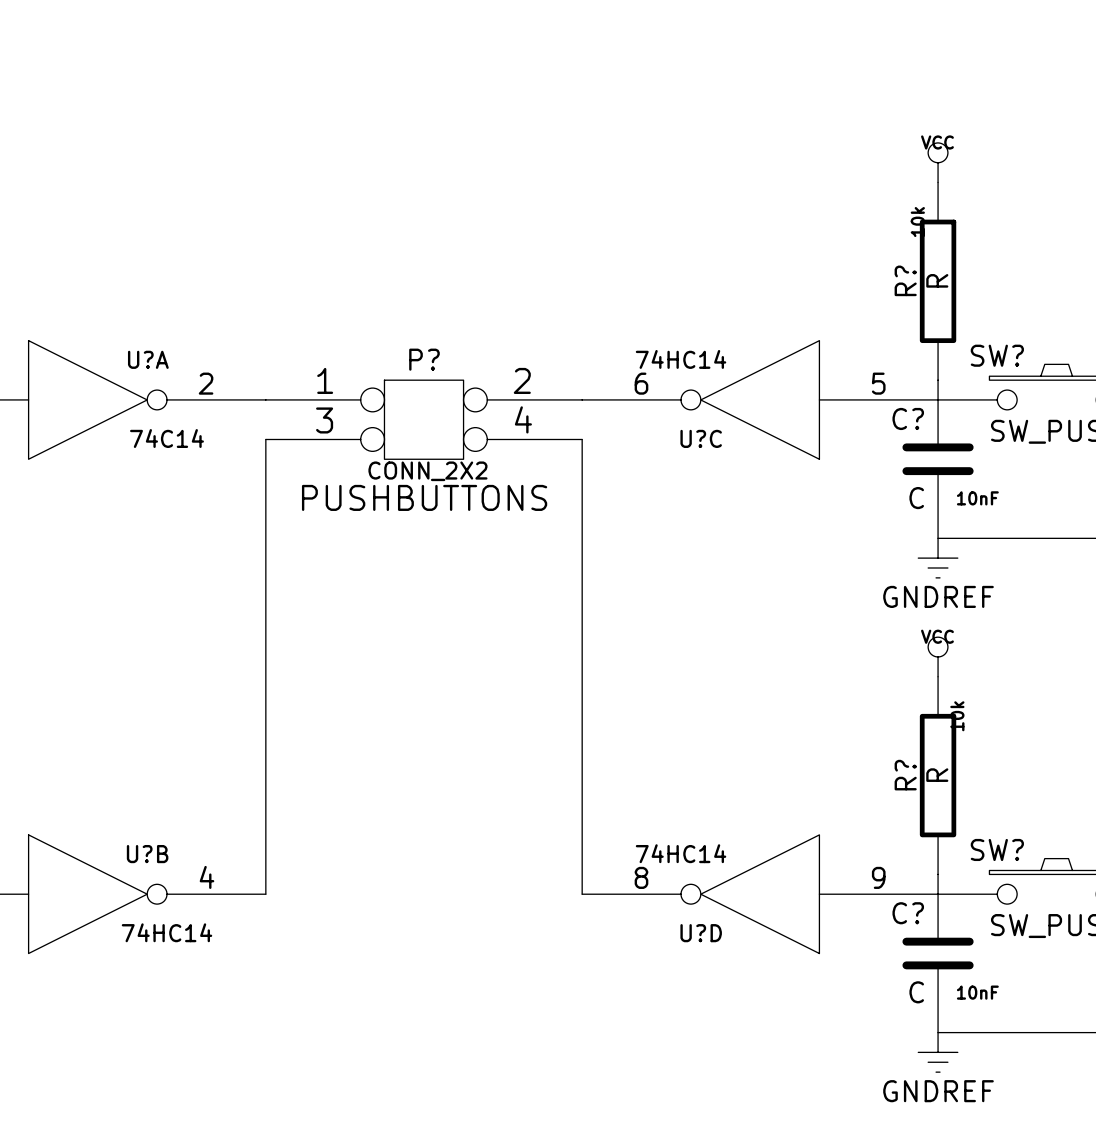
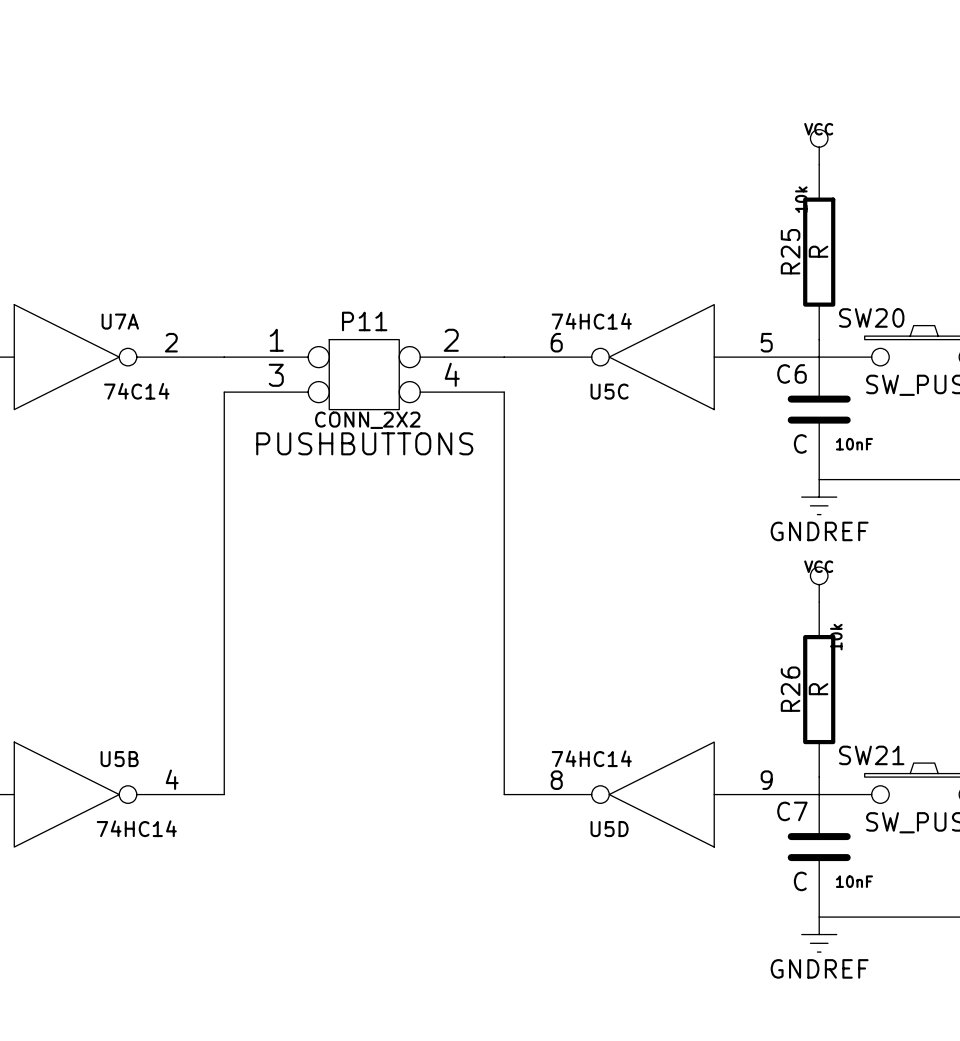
R? name: R? (905, 280) -> R25 (790, 251)
SW? name: SW? (997, 355) -> SW20 (871, 317)
U?A name: U?A (148, 359) -> U7A (120, 321)
P? name: P? (424, 359) -> P11 (364, 321)
C? name: C? (908, 418) -> C6 (792, 373)
U?C name: U?C (701, 438) -> U5C (609, 391)
R? name: R? (905, 775) -> R26 (790, 689)
SW? name: SW? (997, 849) -> SW21 (871, 755)
U?B name: U?B (147, 854) -> U5B (119, 759)
C? name: C? (908, 913) -> C7 (792, 811)
U?D name: U?D (701, 933) -> U5D (609, 829)

